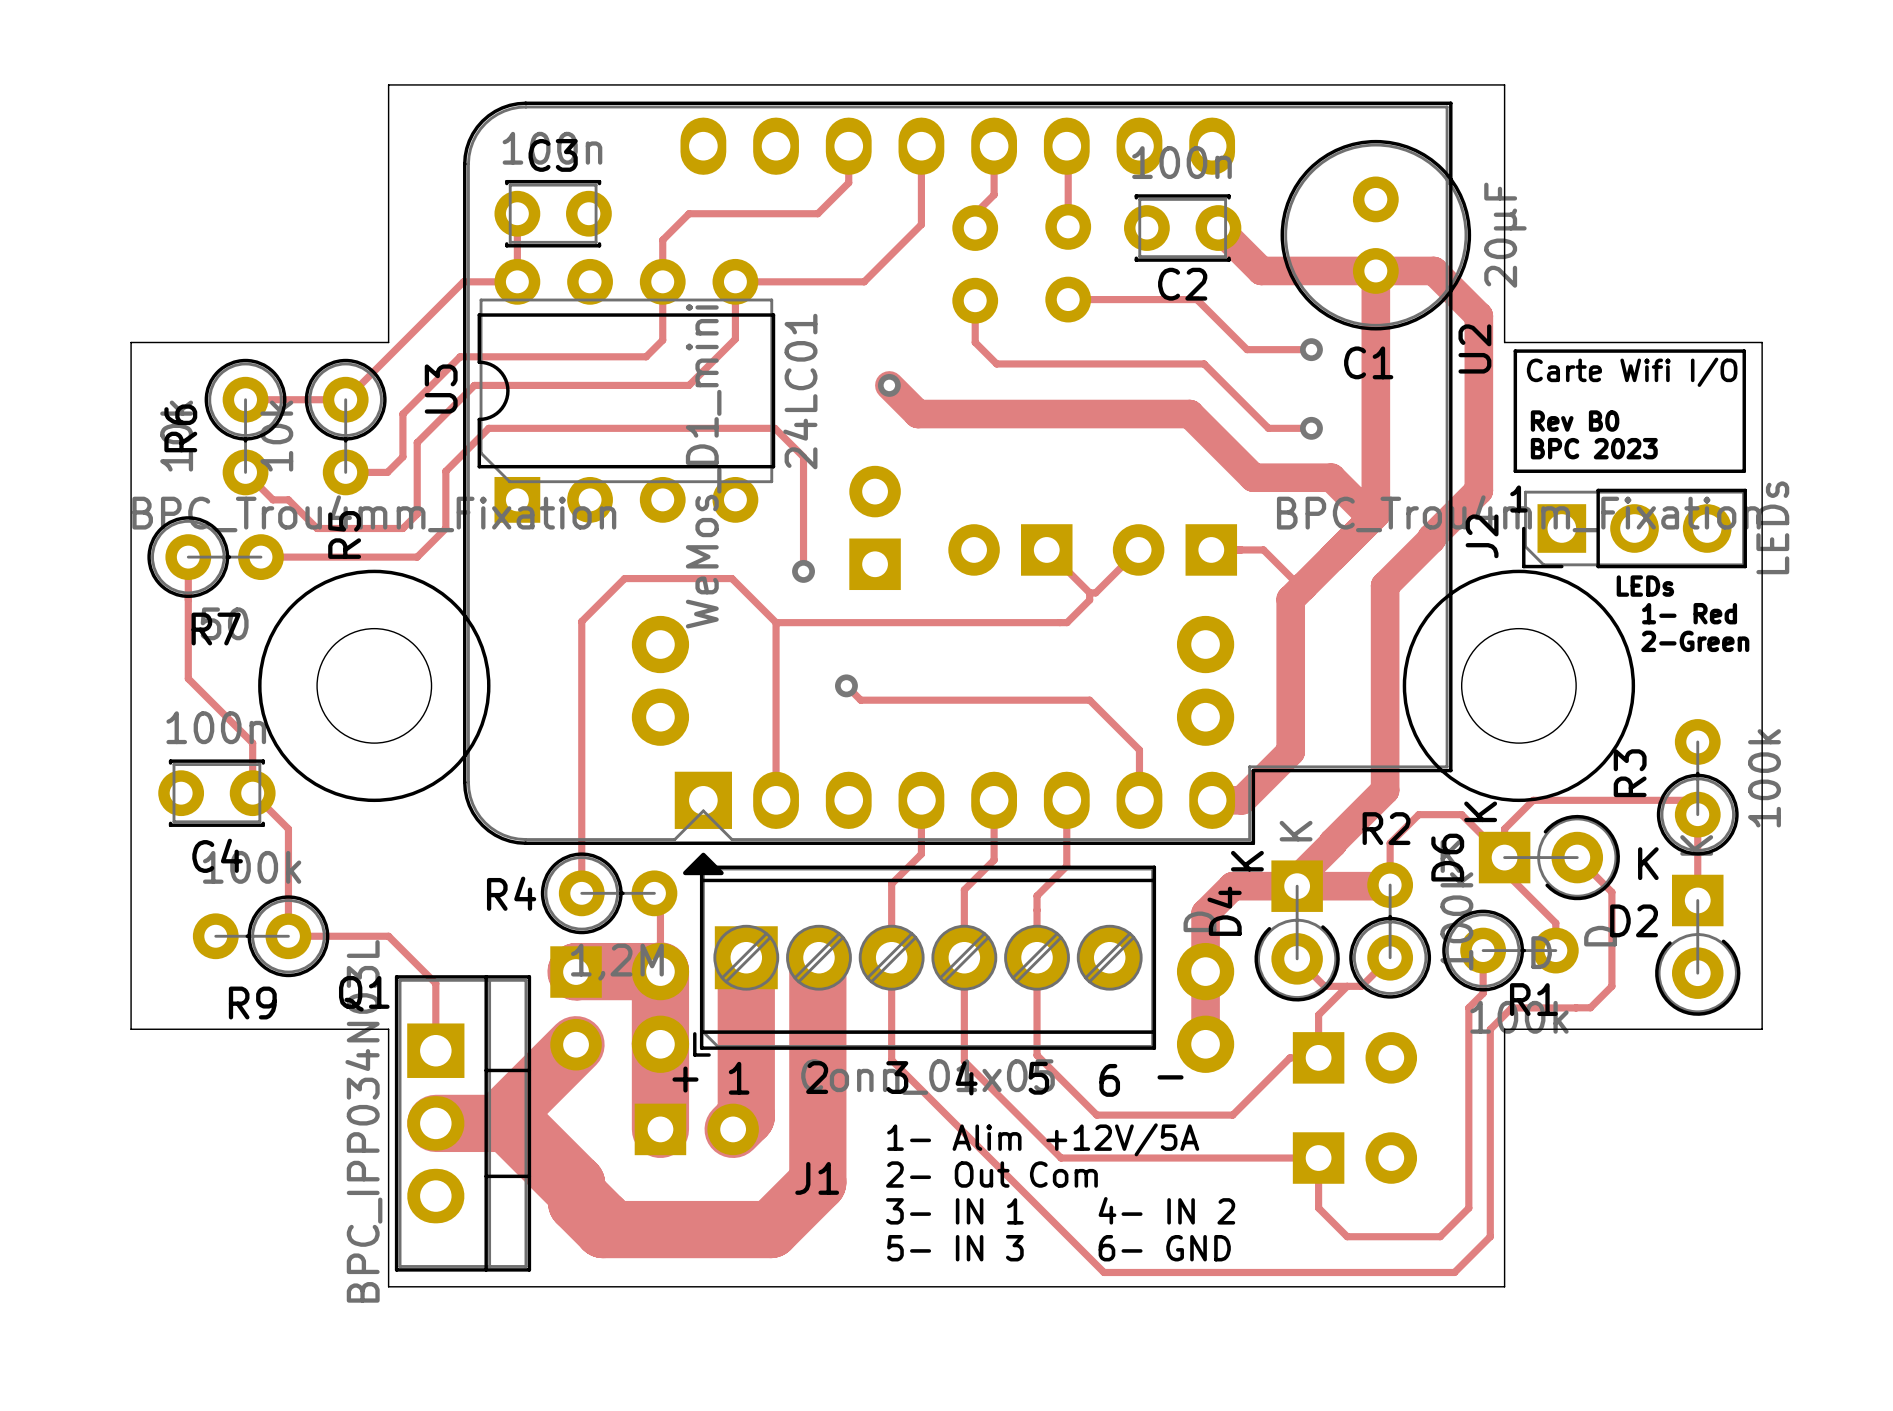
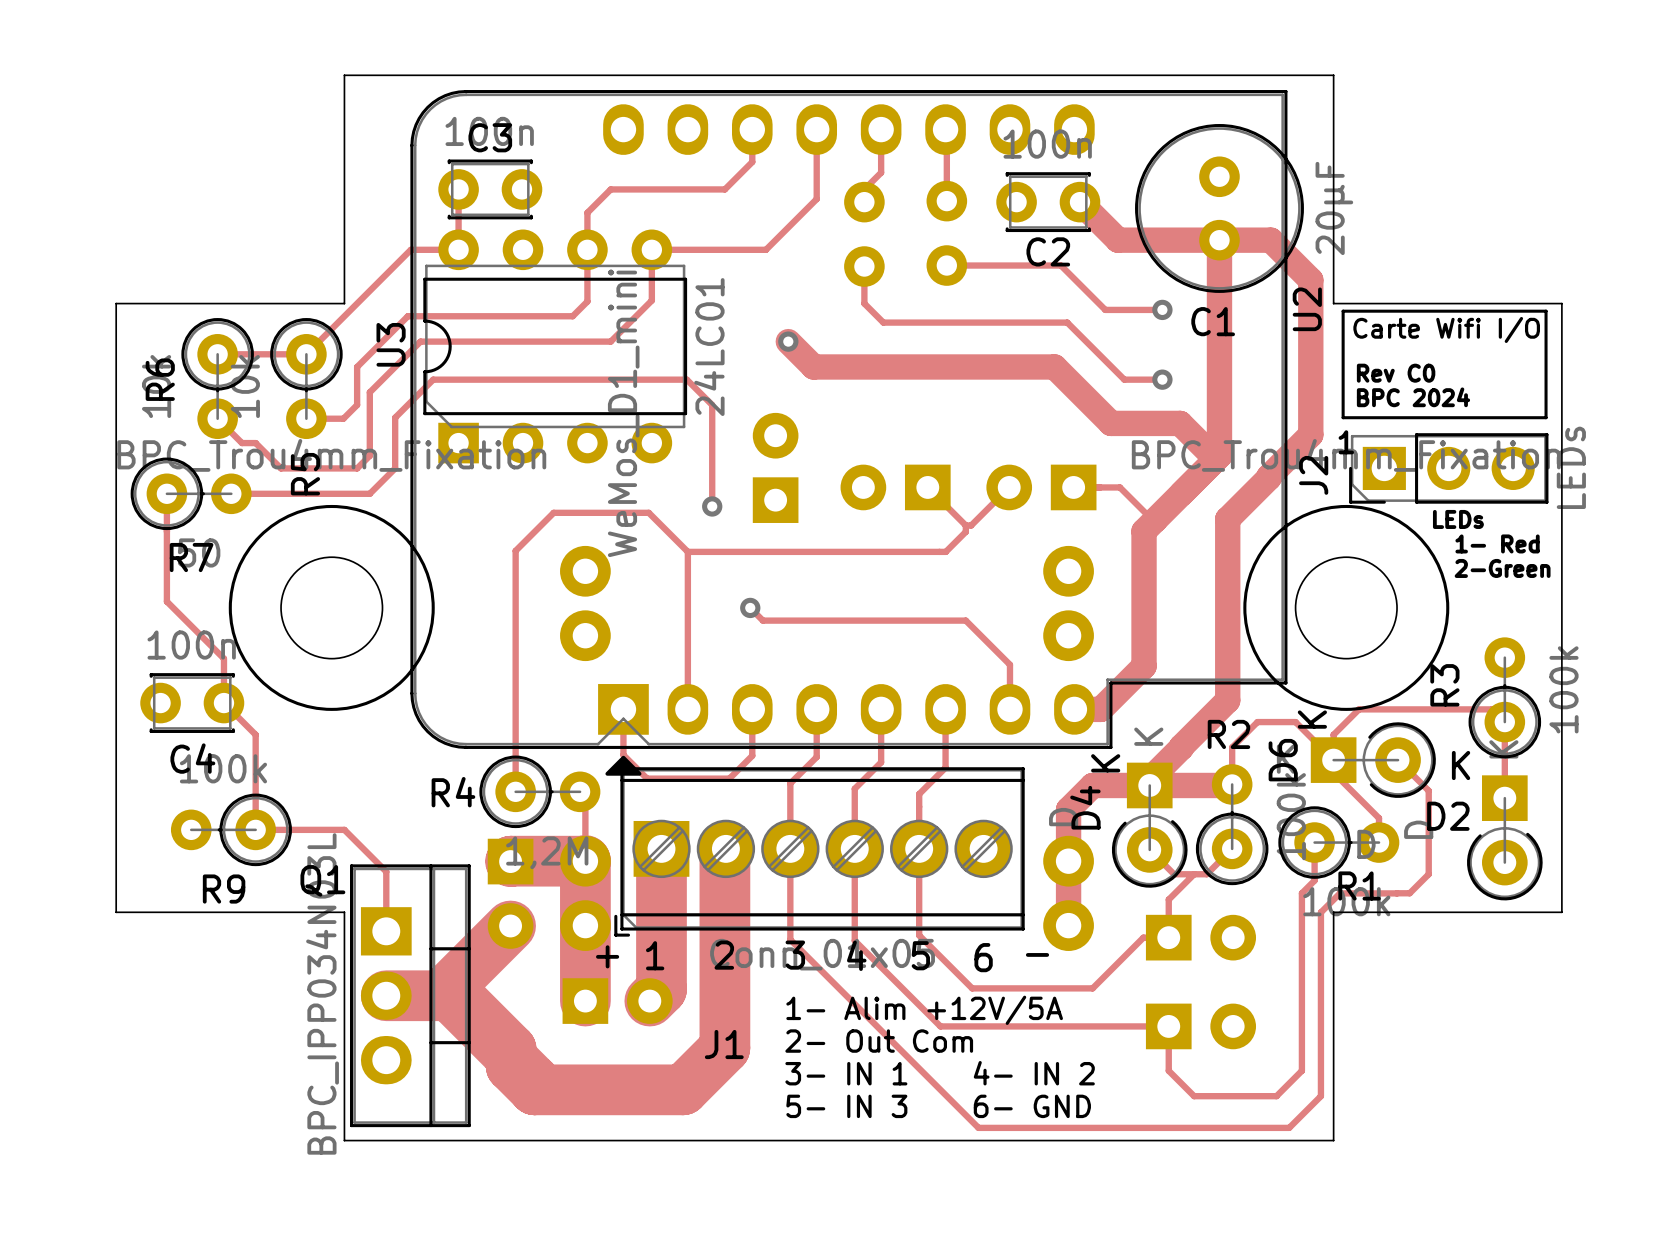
text: Rev B0 (1575, 421) -> Rev C0 (1396, 373)
text: BPC 2023 (1594, 448) -> BPC 2024 (1413, 397)
track: none -> (623, 709) (623, 755) (647, 778) (729, 778) (752, 755) (752, 709)

